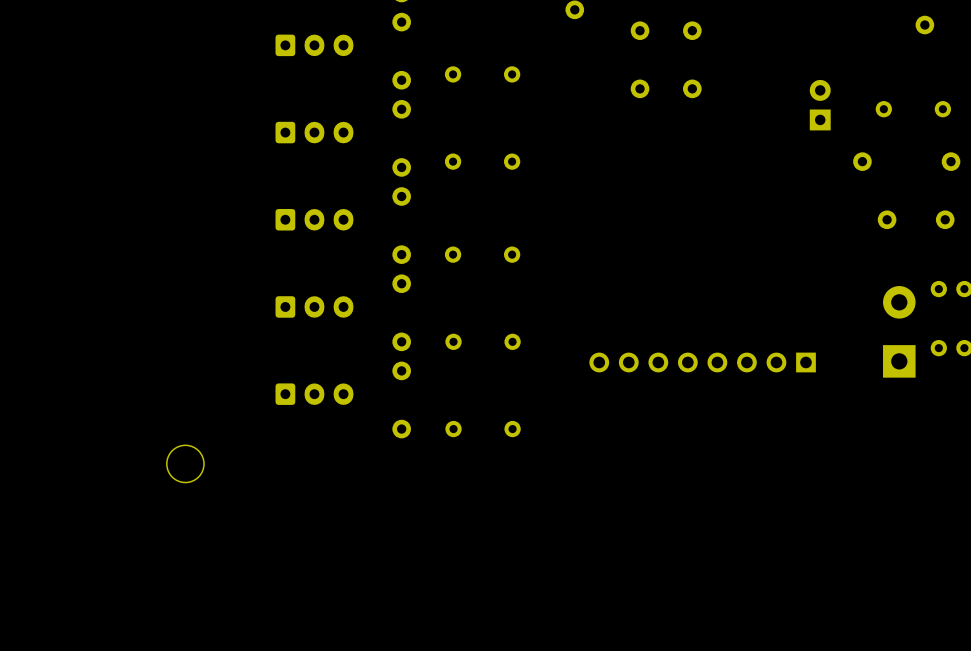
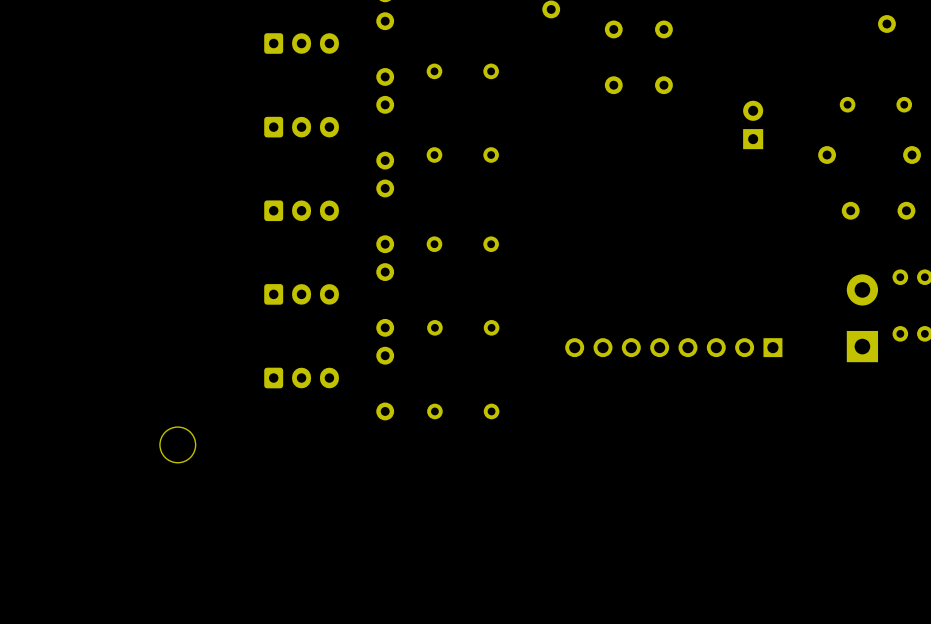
part position: (820, 105) -> (753, 124)

